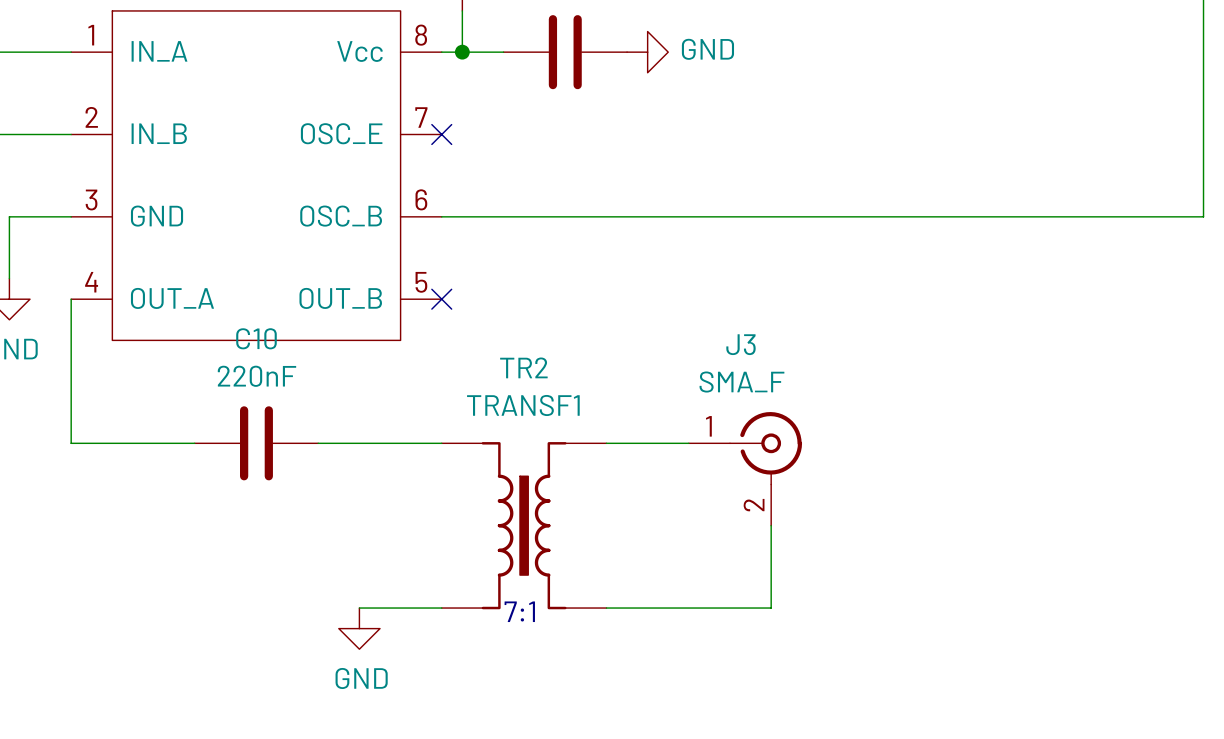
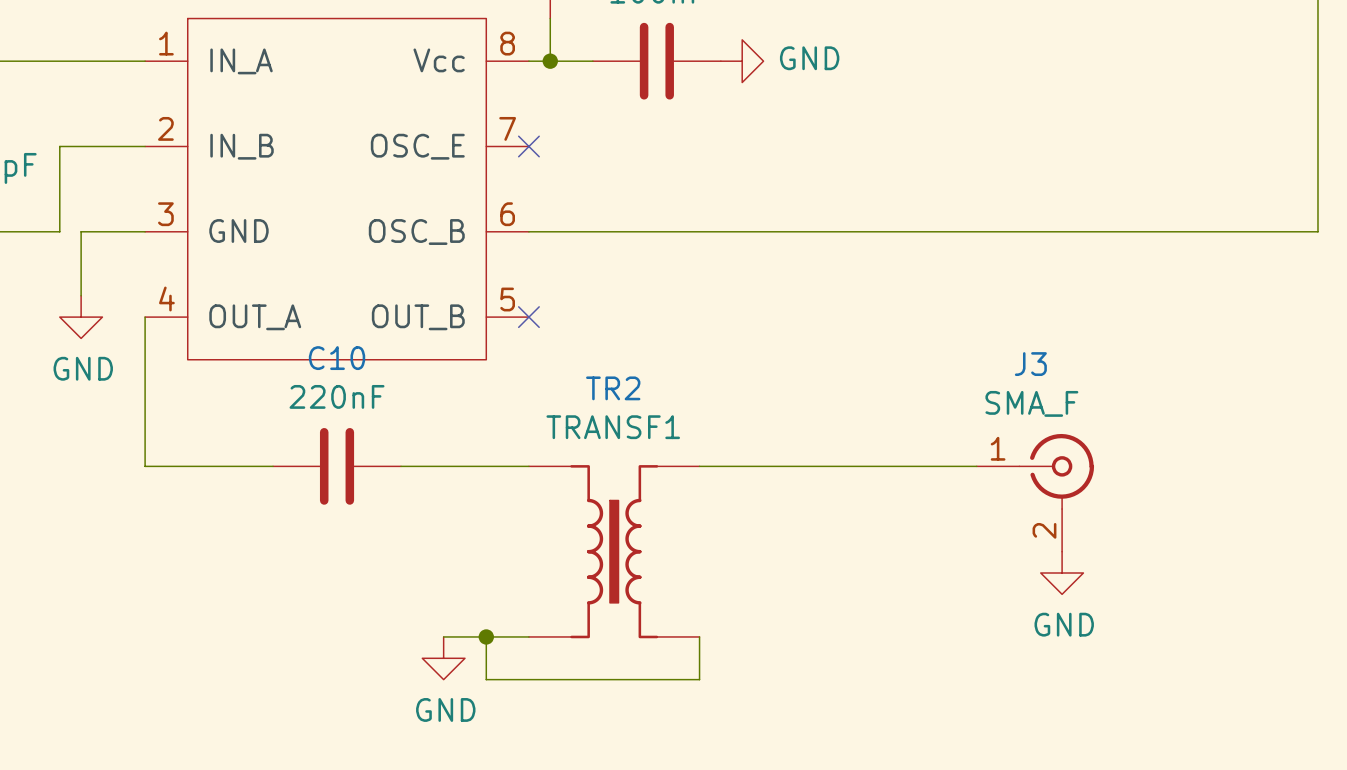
wire: none -> (784, 466) (976, 466)
J3 position: (745, 468) -> (1035, 492)
wire: (771, 525) (771, 608) (606, 608) -> (486, 636) (486, 679) (699, 679) (699, 636)
power symbol: none -> GND (1062, 573)
junction: none -> (486, 636)
text: 7:1 (519, 611) -> none

